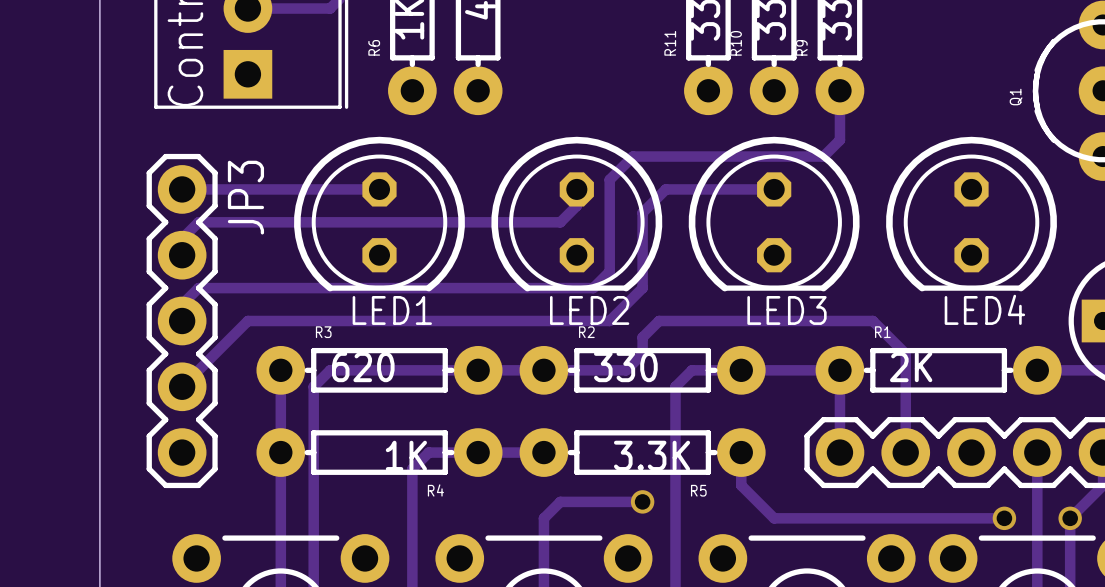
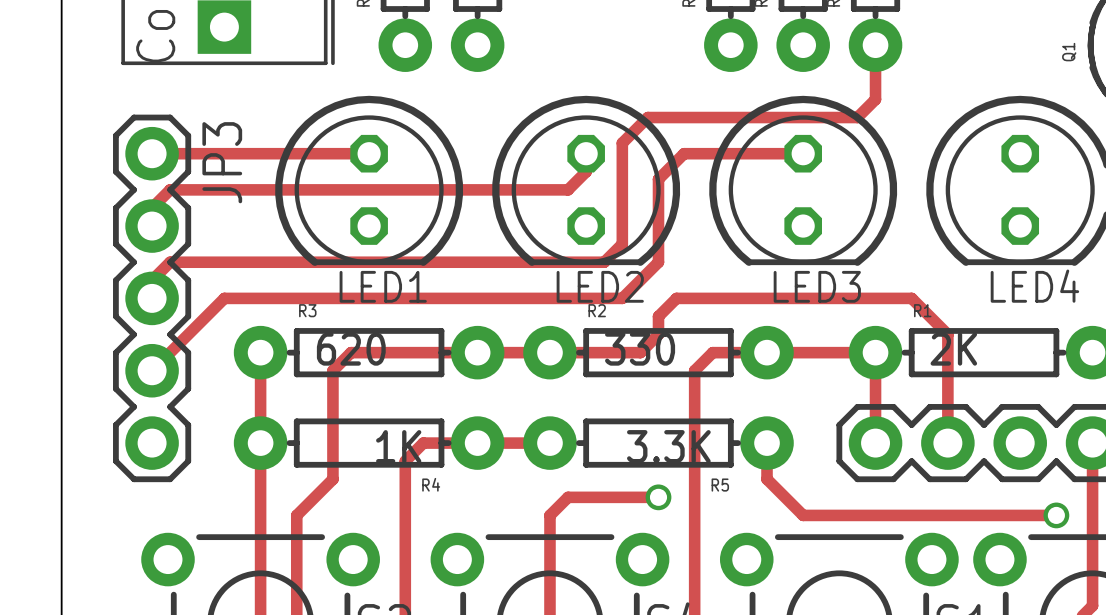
track: (363, 370) (330, 370) (313, 386) (313, 518) -> (351, 352) (332, 370) (332, 479) (296, 515)

